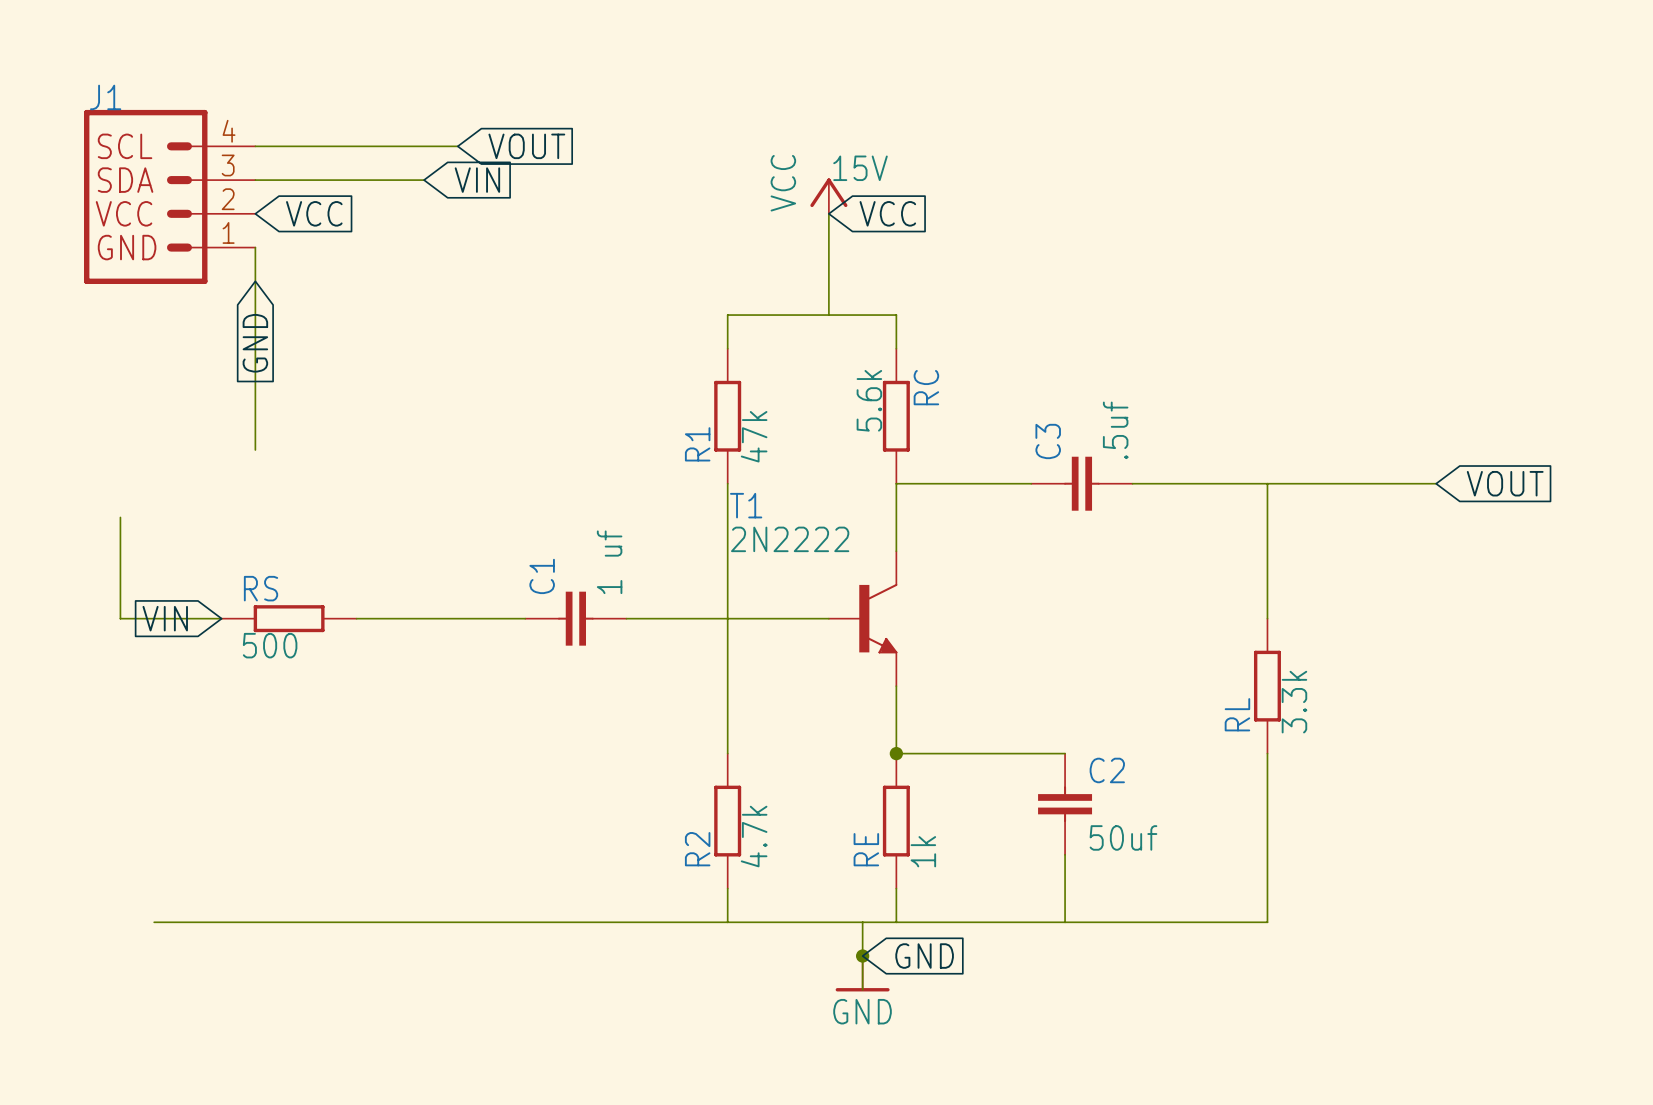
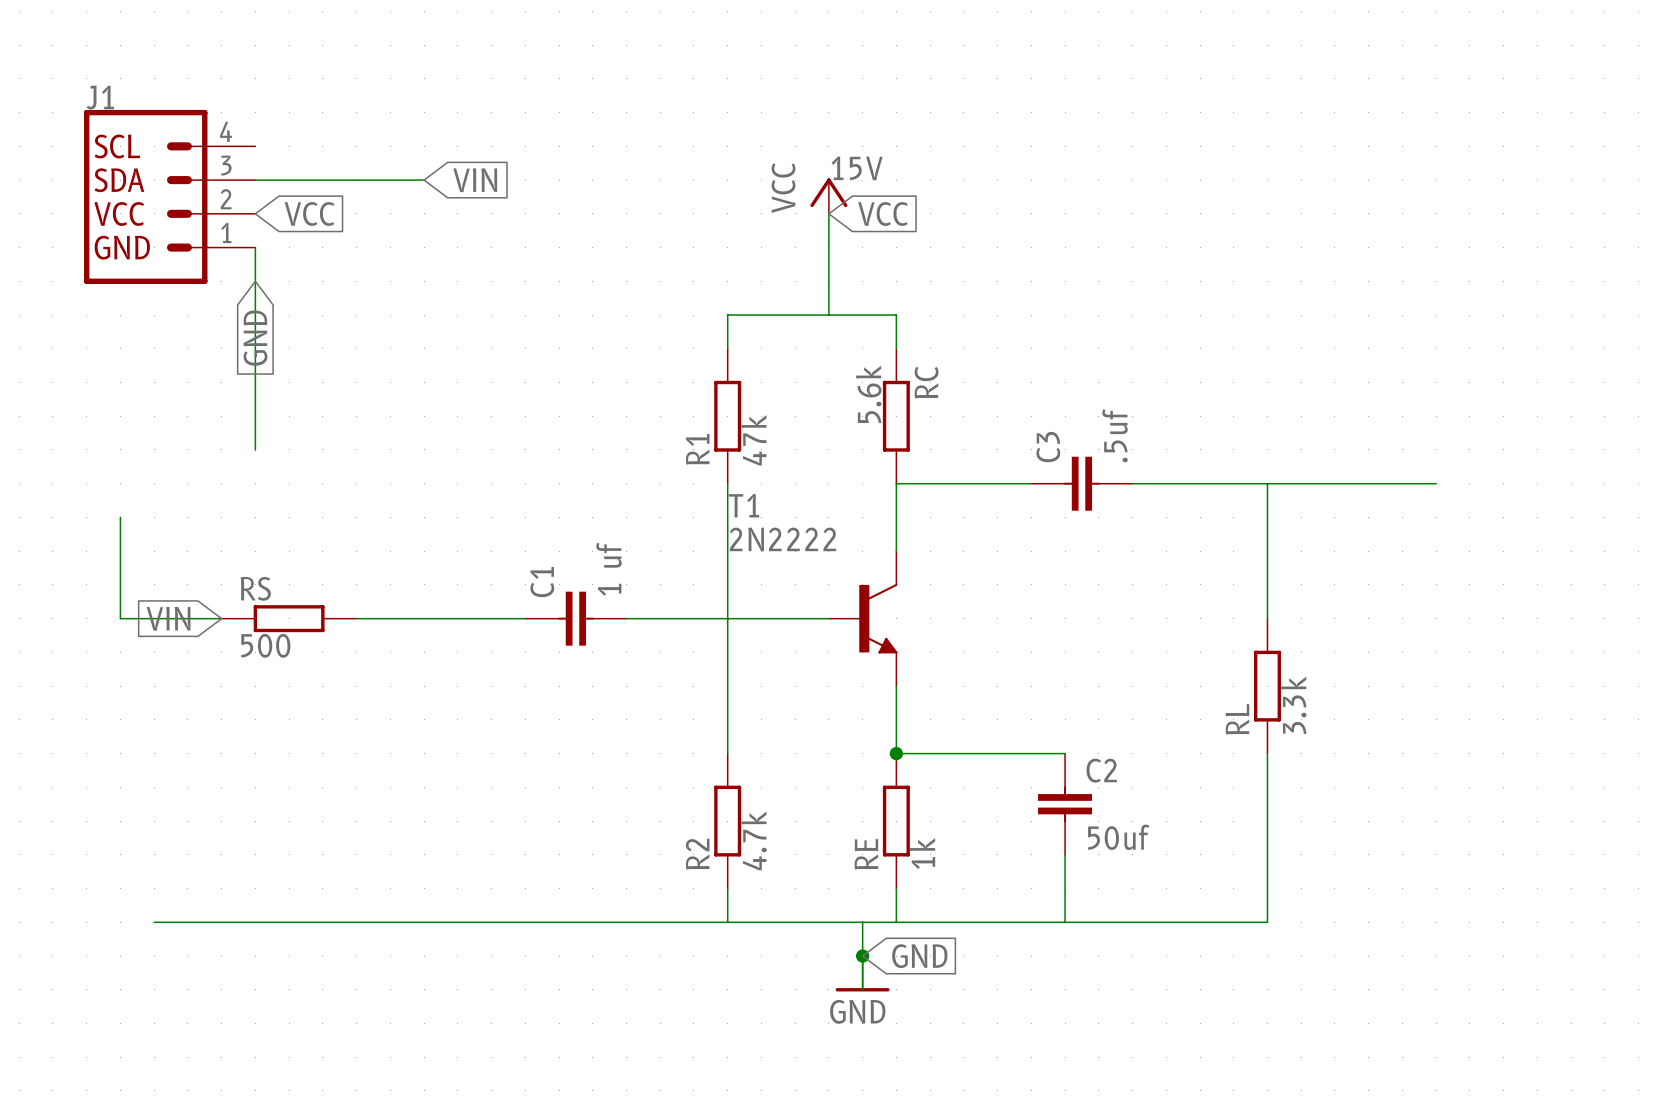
wire: (255, 146) (457, 146) -> none
global label: VOUT (526, 146) -> none
global label: VOUT (1505, 483) -> none

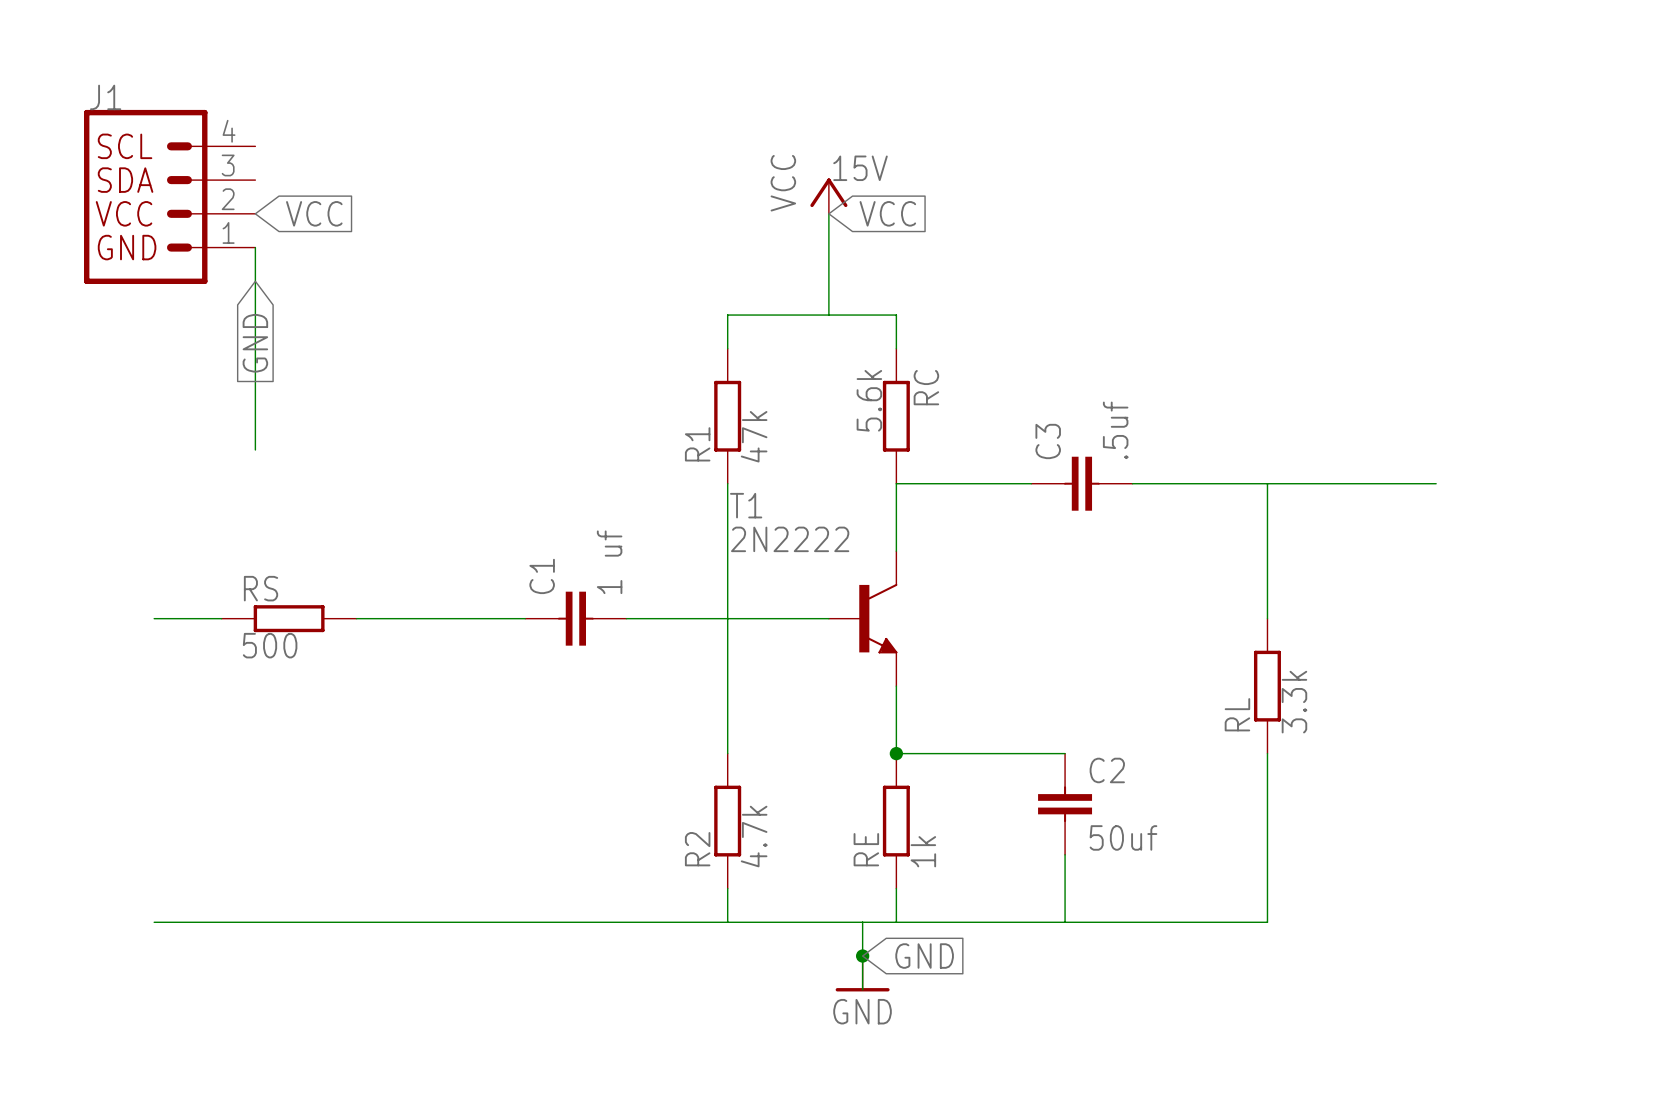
wire: (255, 180) (424, 180) -> none
global label: VIN (475, 180) -> none
wire: (120, 517) (120, 618) (154, 618) -> none
global label: VIN (168, 618) -> none

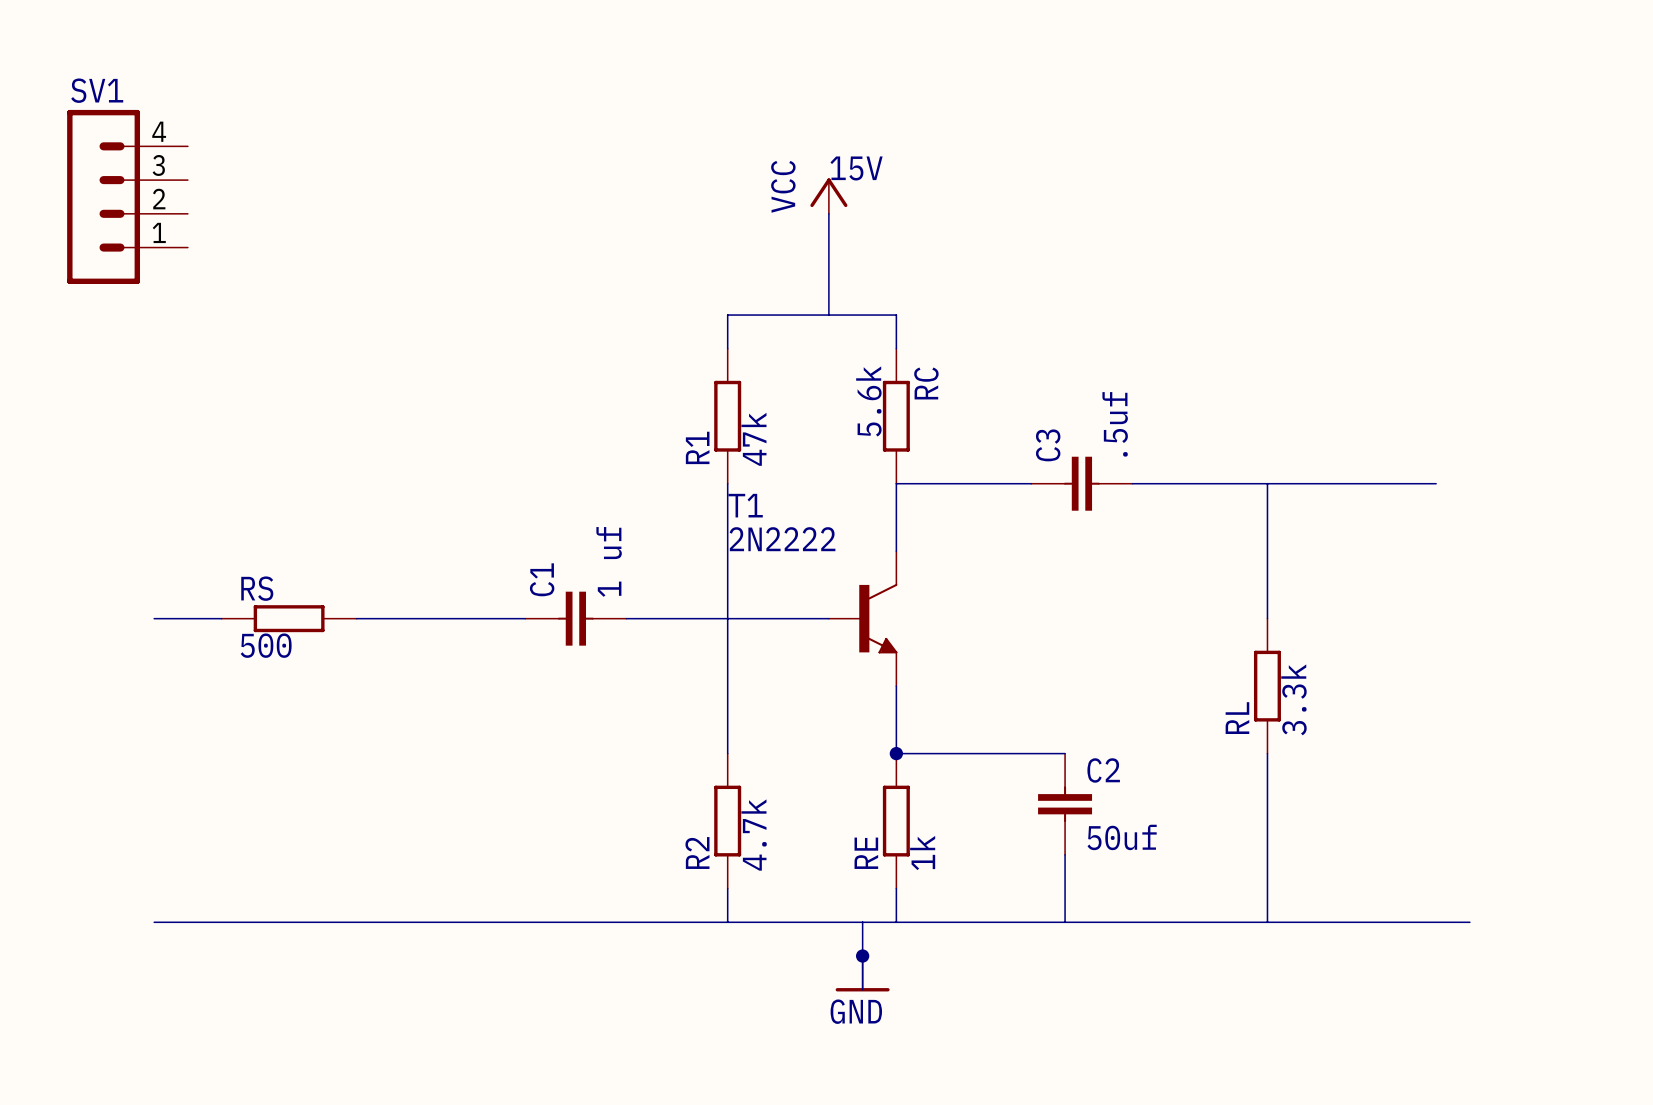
SV1: none -> (127, 196)
J1: (169, 196) -> none
global label: VCC (314, 213) -> none
global label: VCC (887, 213) -> none
wire: (255, 247) (255, 449) -> none
global label: GND (255, 343) -> none
wire: none -> (1267, 922) (1469, 922)
global label: GND (924, 956) -> none

